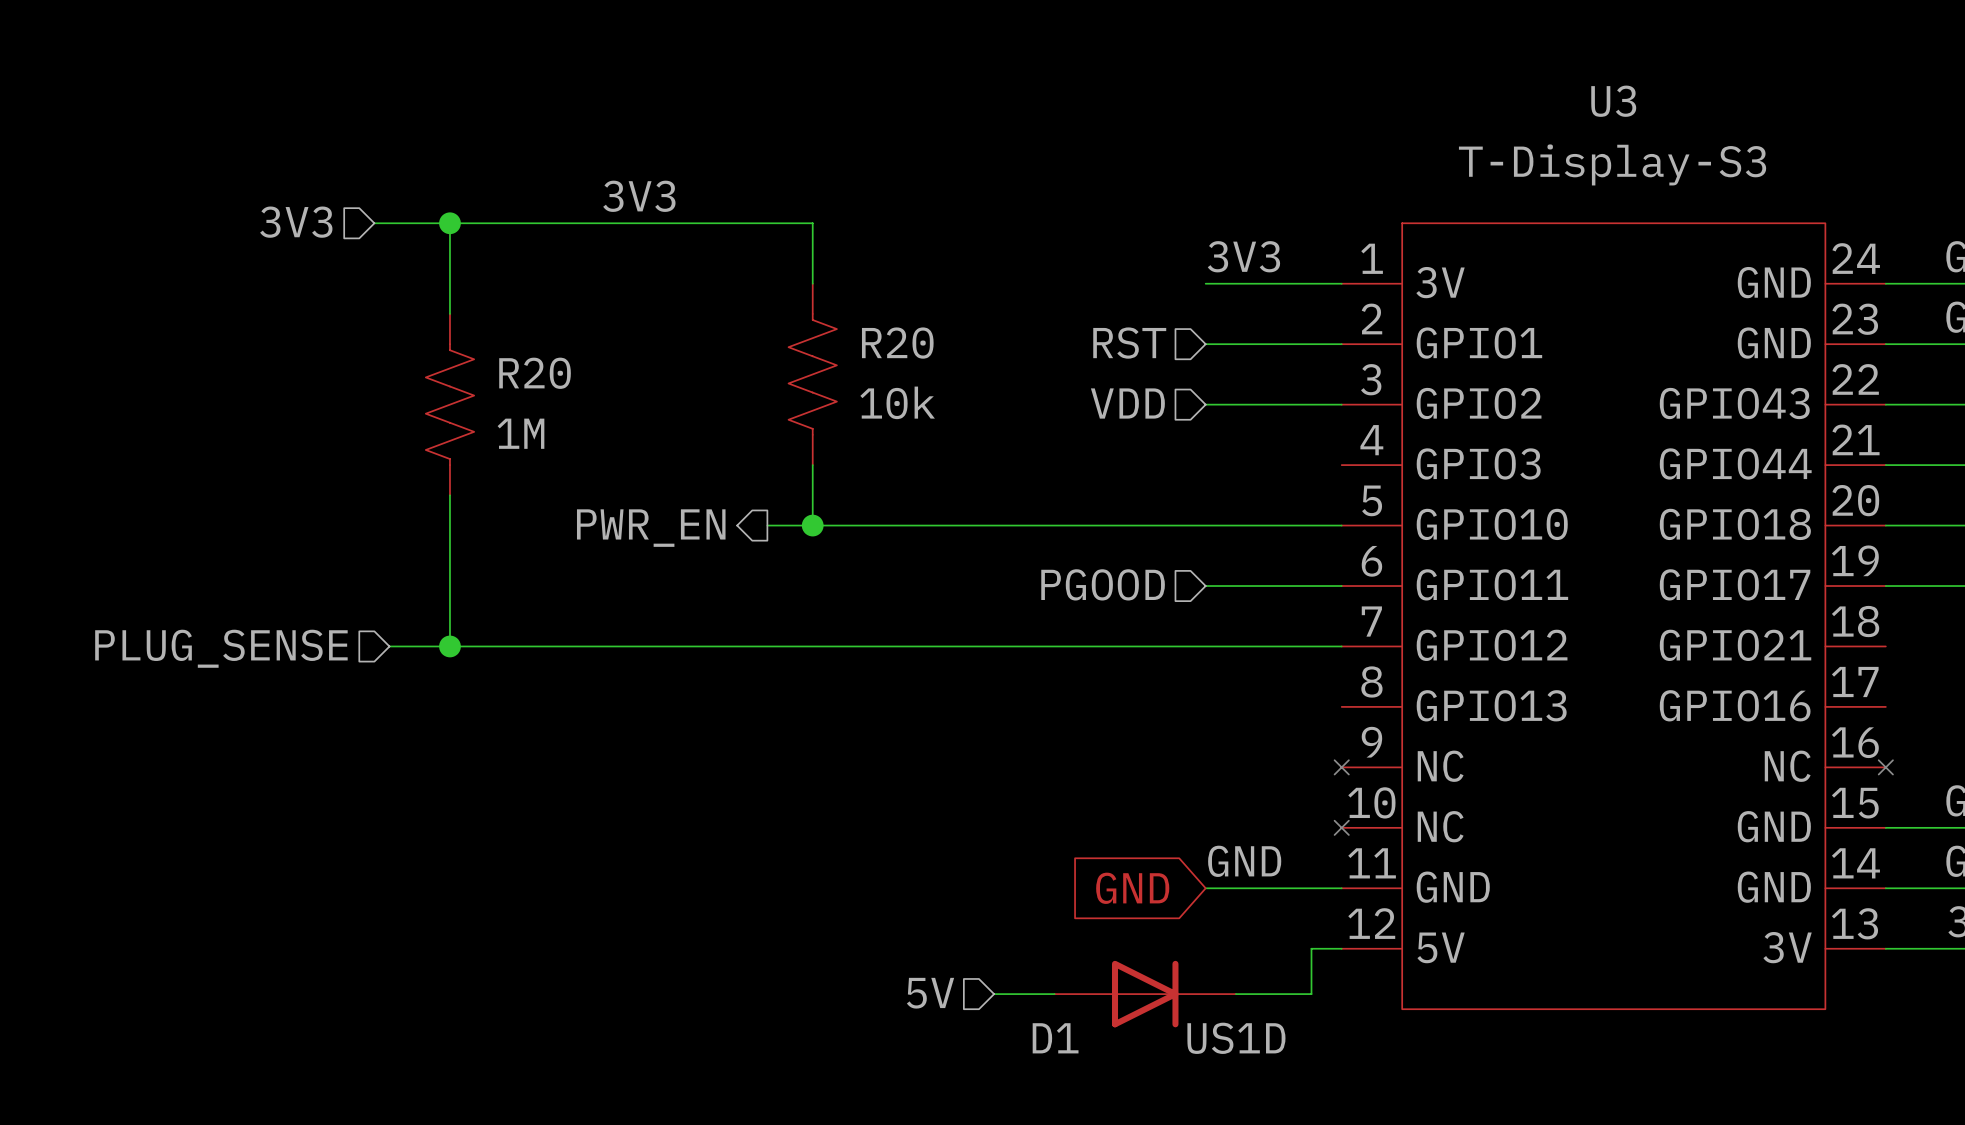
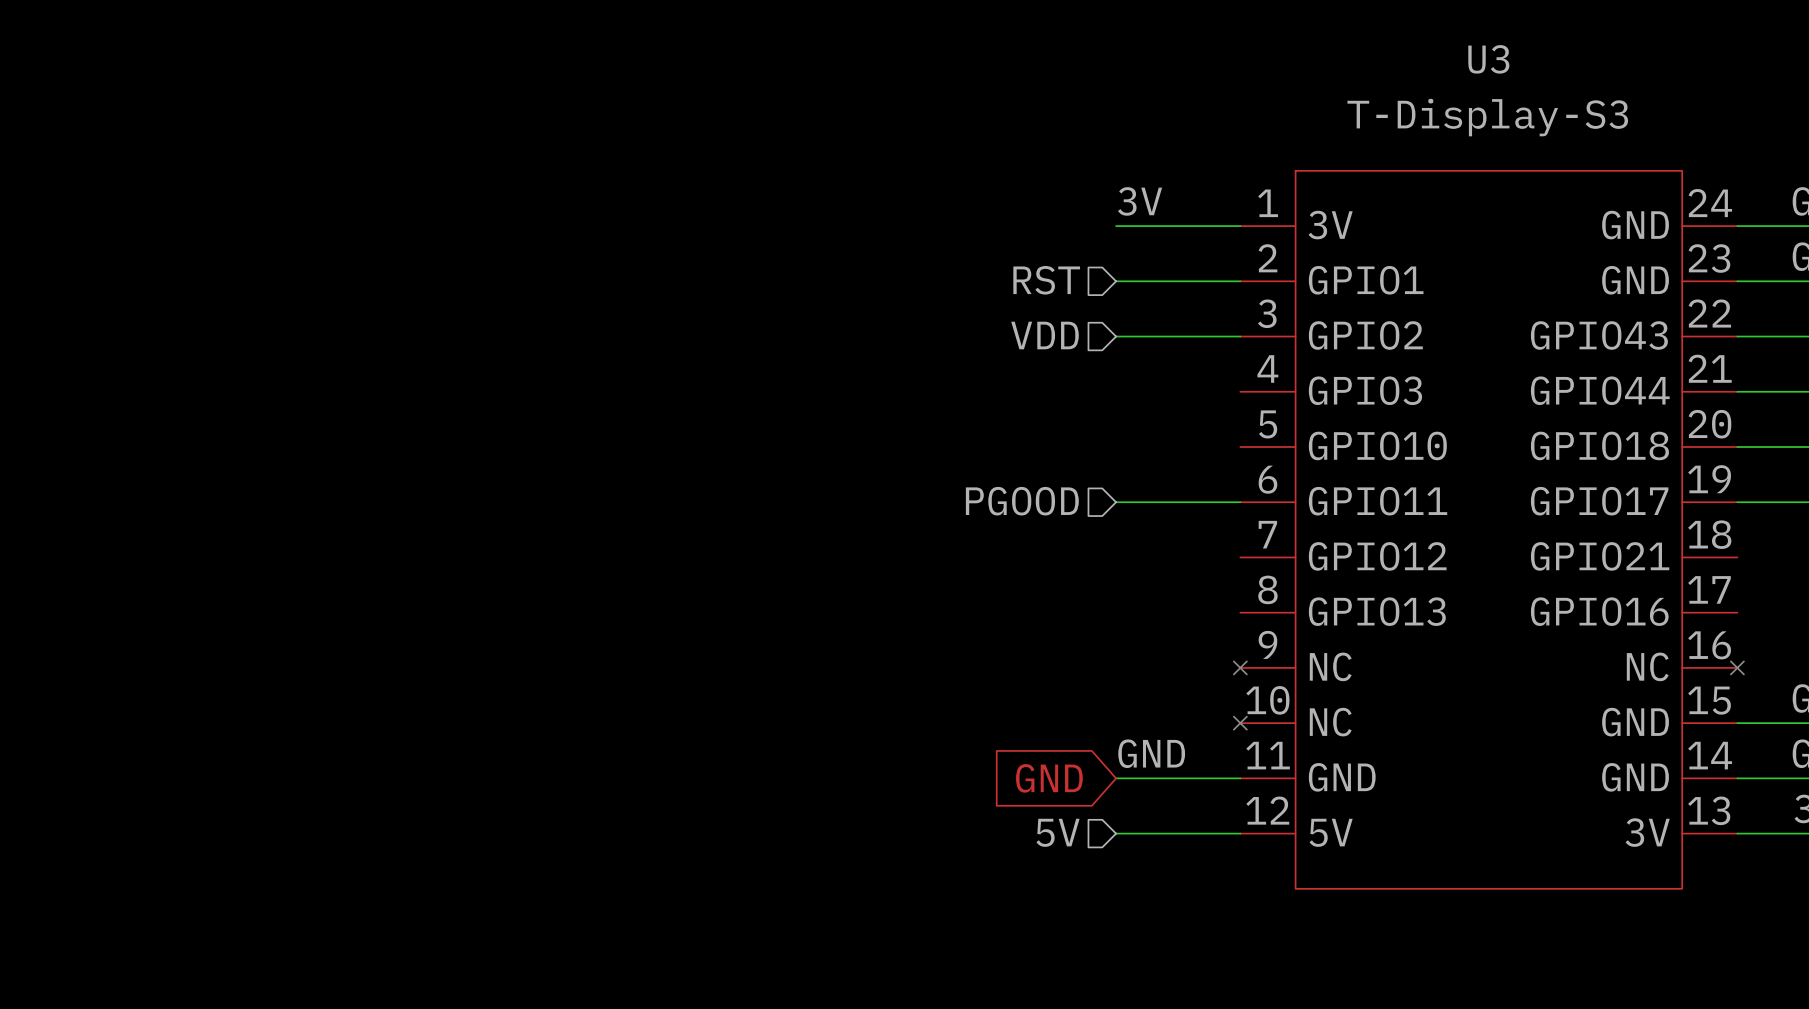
label: 3V3 (639, 196) -> none
hierarchical label: 3V3 (296, 222) -> none
wire: (374, 223) (812, 223) (812, 283) -> none
wire: (449, 223) (449, 313) -> none
junction: (449, 223) -> none
label: 3V3 (1243, 256) -> 3V (1140, 201)
R20: 10k (812, 374) -> none
R20: 1M (449, 404) -> none
wire: (812, 465) (812, 525) -> none
wire: (449, 495) (449, 646) -> none
wire: (767, 525) (1341, 525) -> none
junction: (812, 525) -> none
hierarchical label: PWR_EN (651, 528) -> none
wire: (389, 646) (1341, 646) -> none
junction: (449, 646) -> none
hierarchical label: PLUG_SENSE (221, 648) -> none
wire: (1311, 948) (1311, 994) (1235, 994) -> (1212, 833) (1116, 833)
hierarchical label position: 5V (930, 993) -> 5V (1058, 832)
wire: (994, 994) (1054, 994) -> none
D1: US1D (1145, 994) -> none

